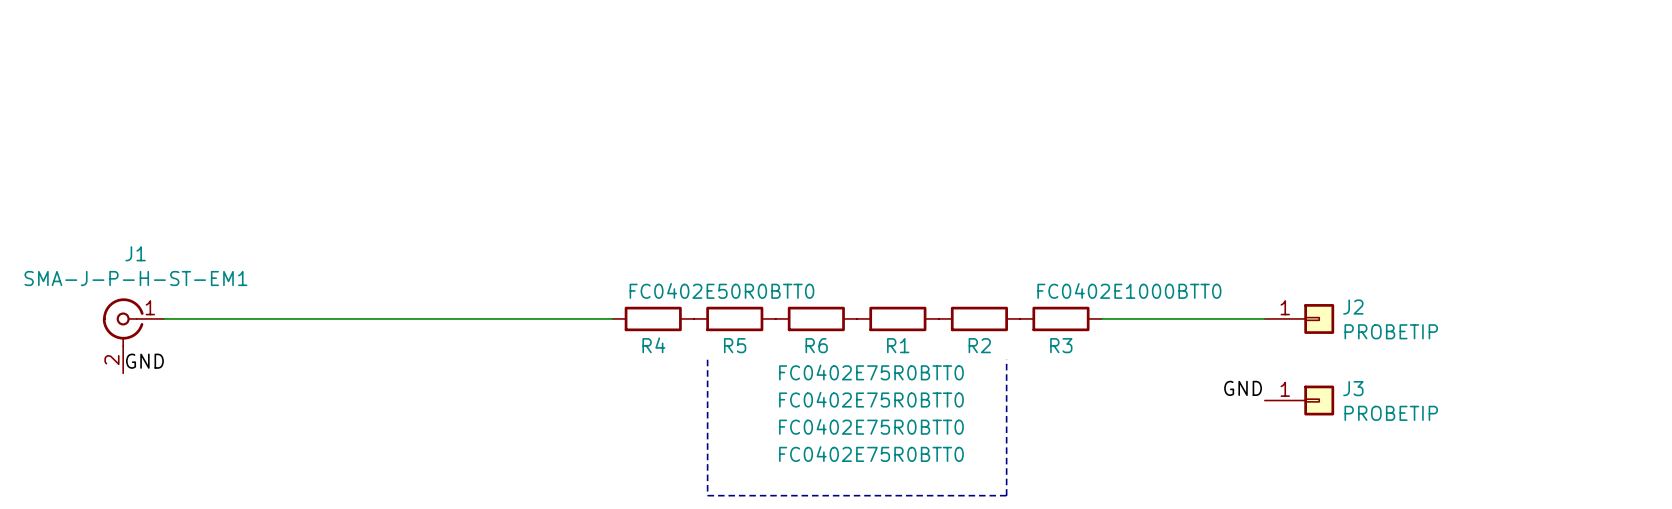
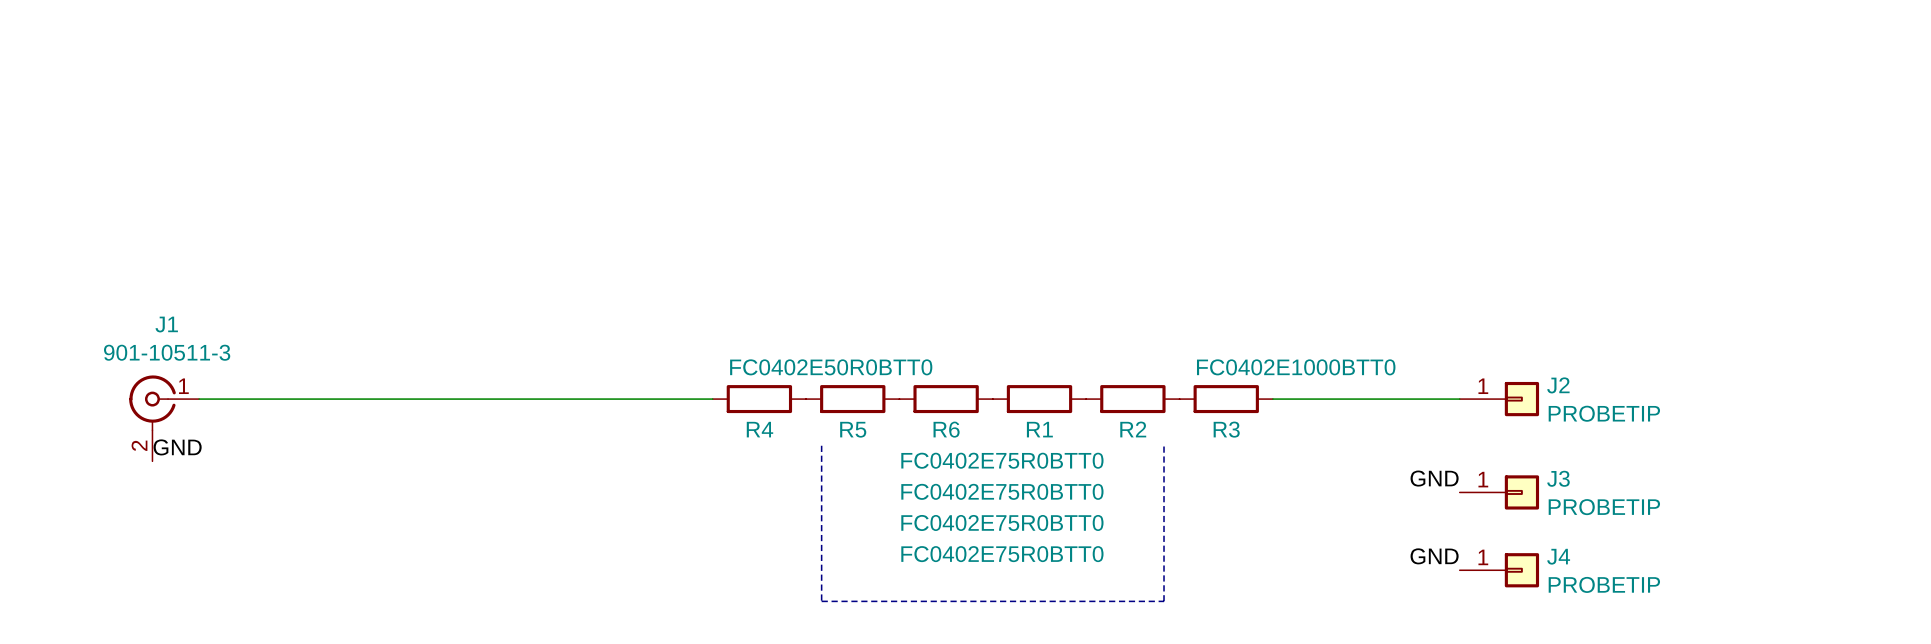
J1 value: SMA-J-P-H-ST-EM1 (135, 278) -> 901-10511-3 (167, 352)
label: none -> GND (1434, 556)
J4: none -> PROBETIP (1499, 570)

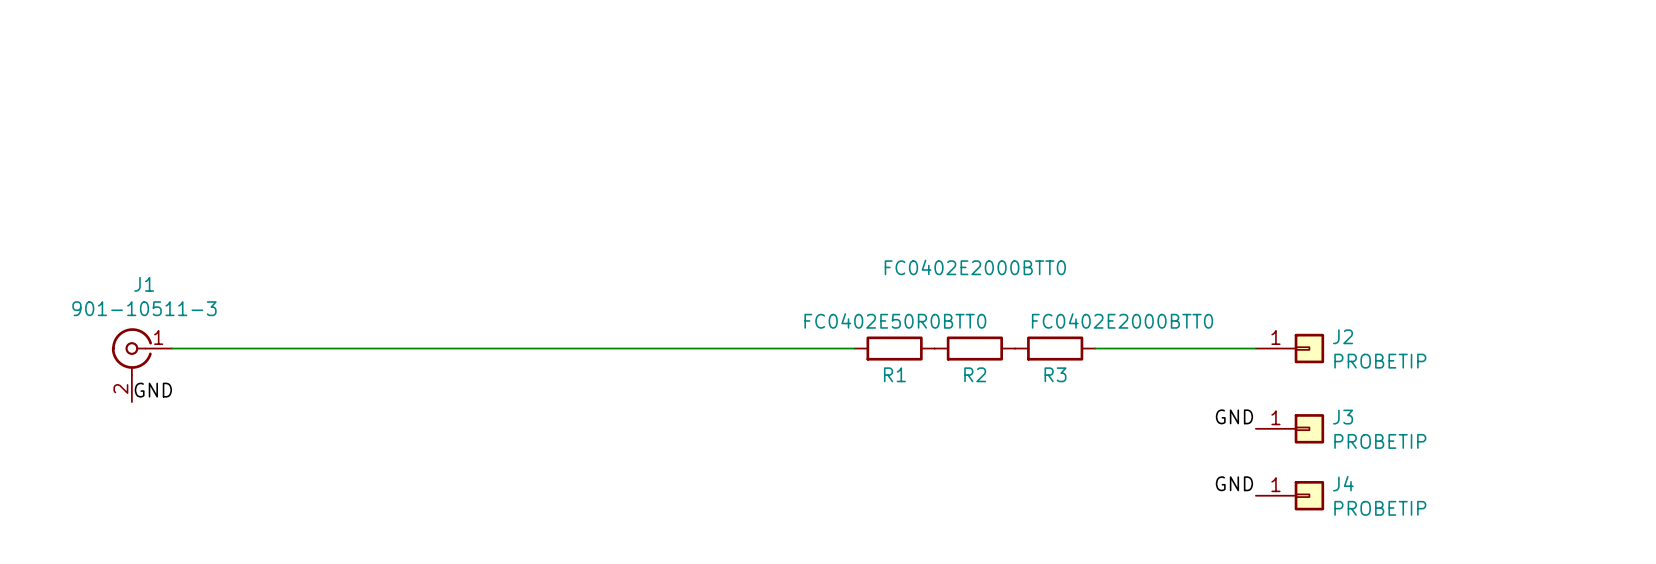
R3 value: FC0402E1000BTT0 (1296, 367) -> FC0402E2000BTT0 (1122, 320)
wire: none -> (613, 348) (854, 348)
R4: FC0402E50R0BTT0 (759, 399) -> none
R5: FC0402E75R0BTT0 (852, 399) -> none
R6: FC0402E75R0BTT0 (946, 399) -> none
line: (821, 445) (821, 601) (1164, 601) (1164, 445) -> none
R2 value: FC0402E75R0BTT0 (1002, 460) -> FC0402E2000BTT0 (975, 267)
R1 value: FC0402E75R0BTT0 (1002, 491) -> FC0402E50R0BTT0 (895, 320)

